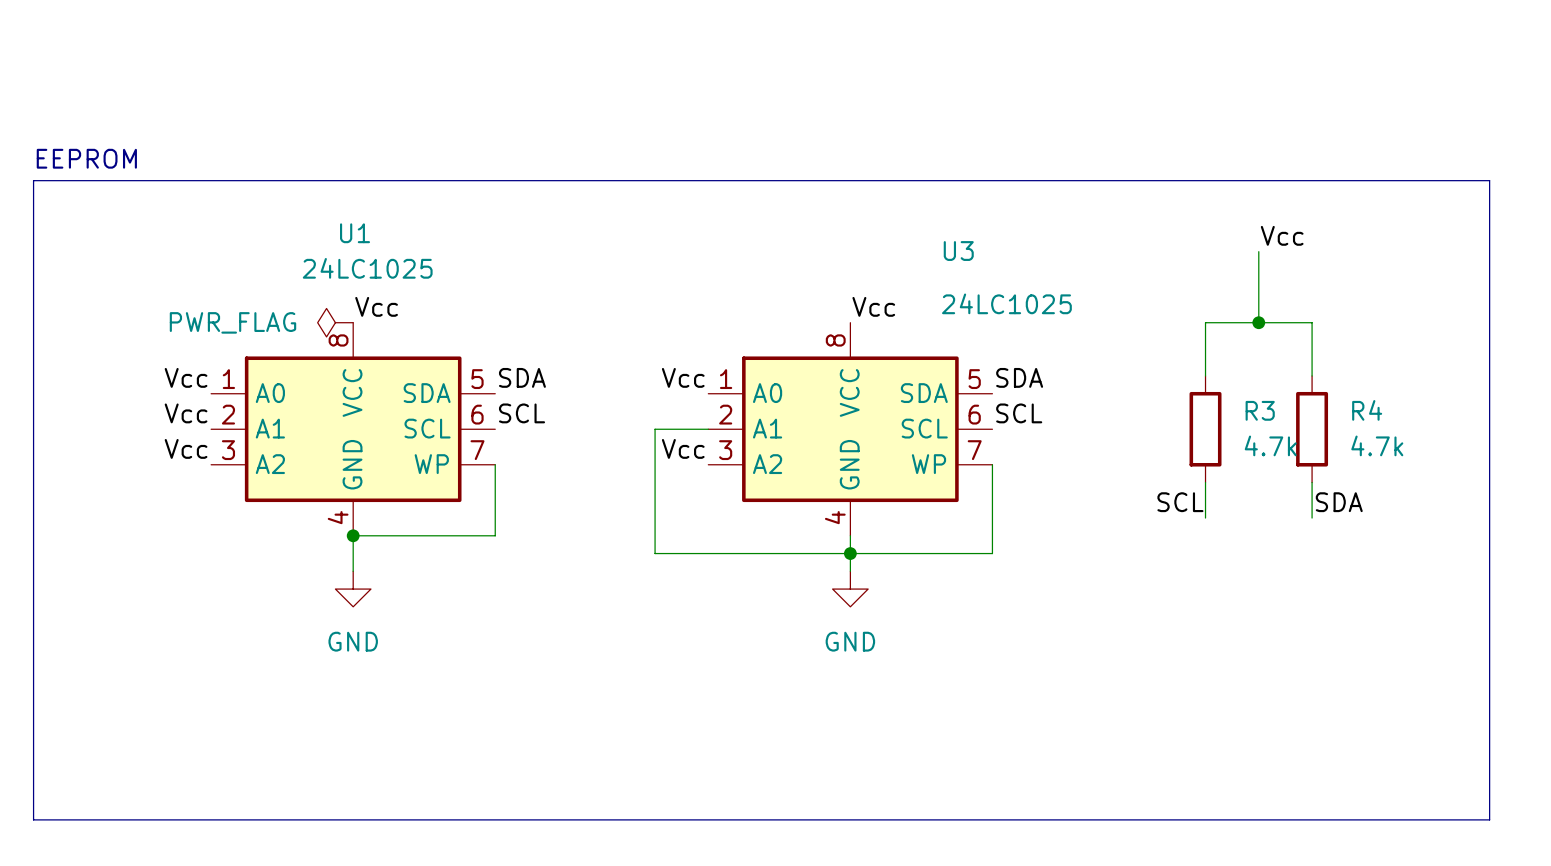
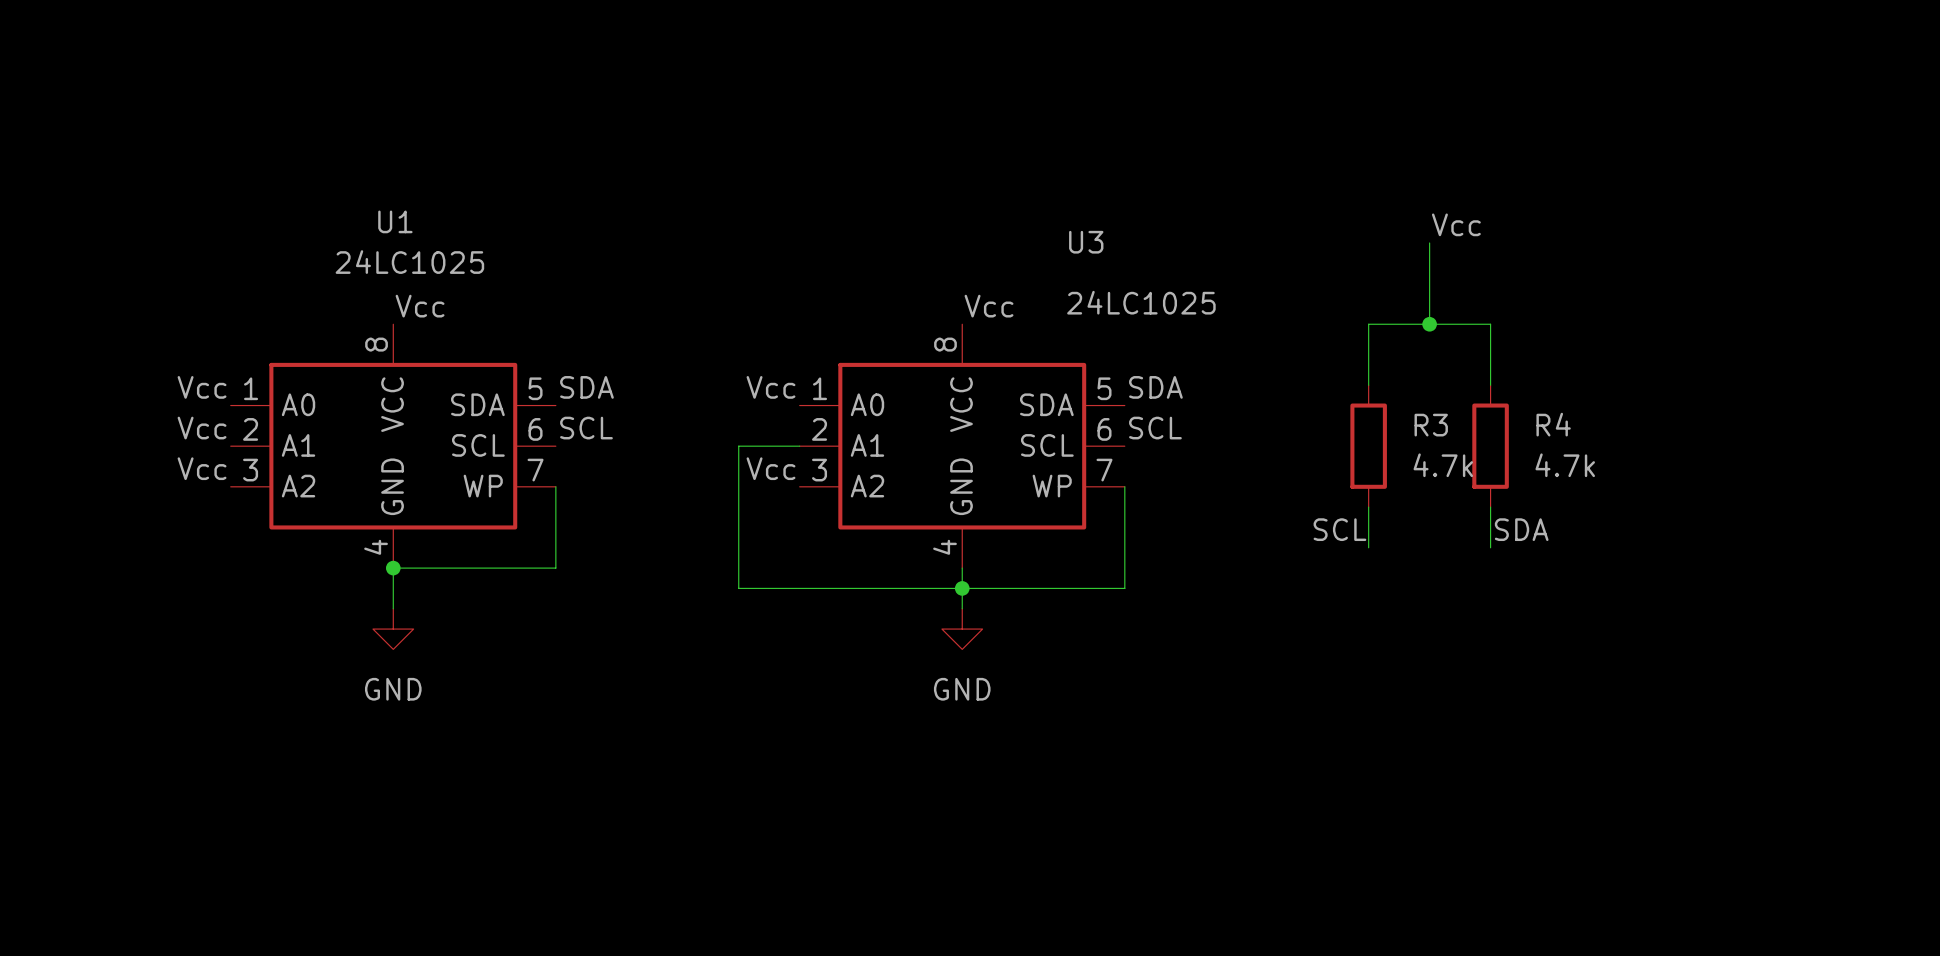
text: EEPROM (86, 158) -> none
line: (33, 180) (1489, 180) (1489, 819) (33, 819) (33, 180) -> none
power symbol: PWR_FLAG (335, 322) -> none

